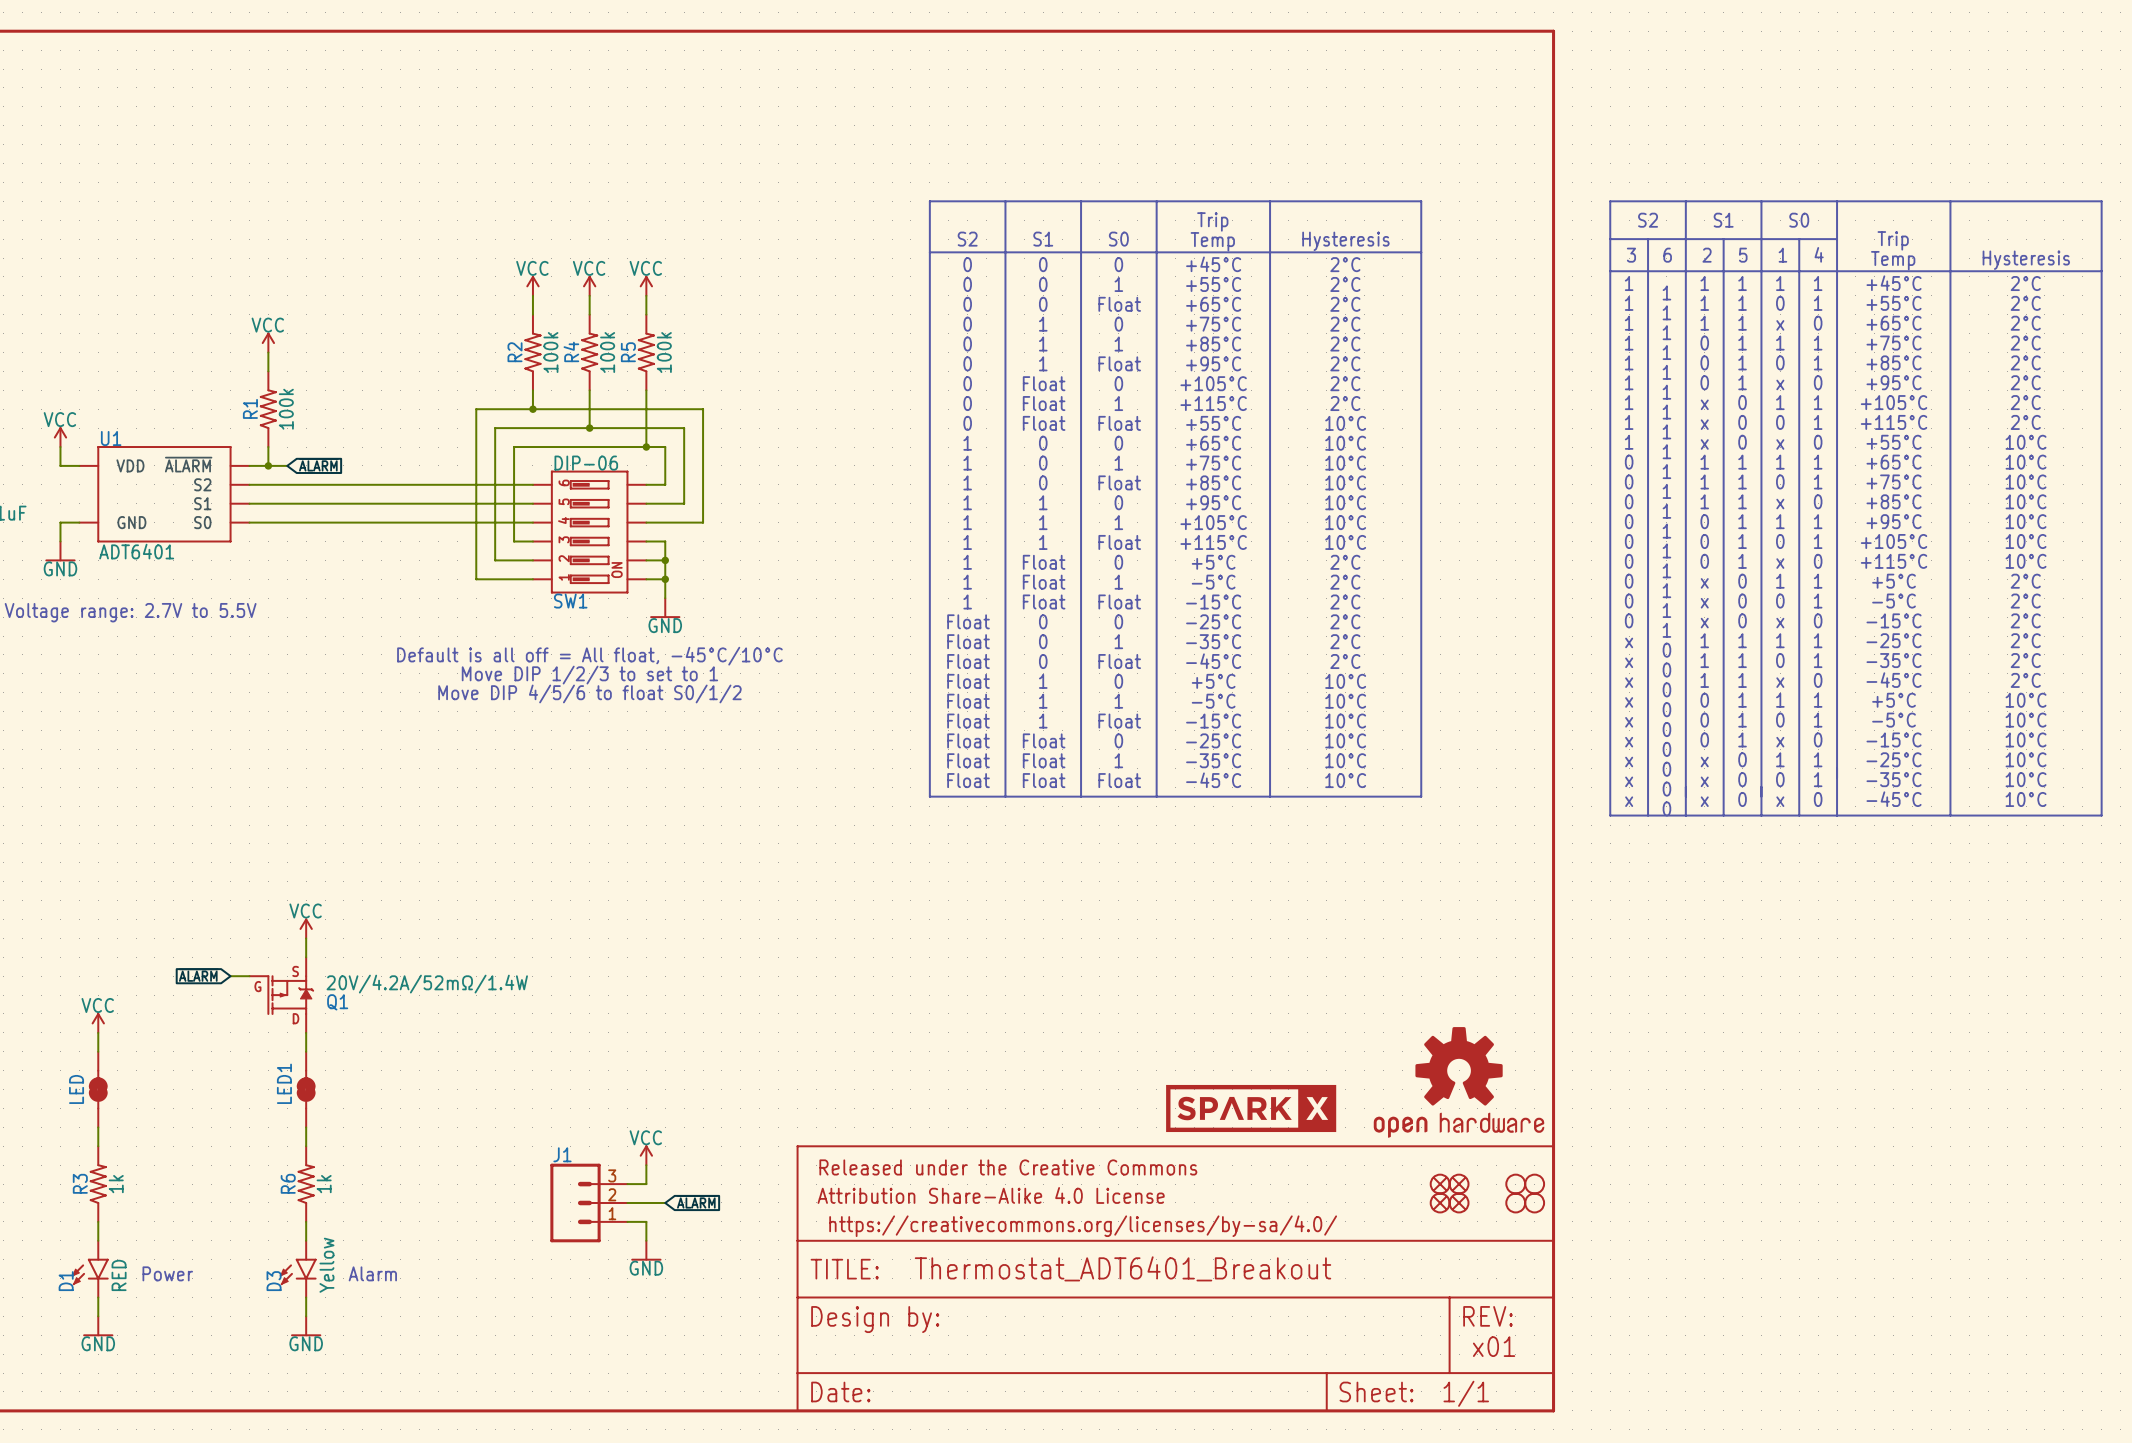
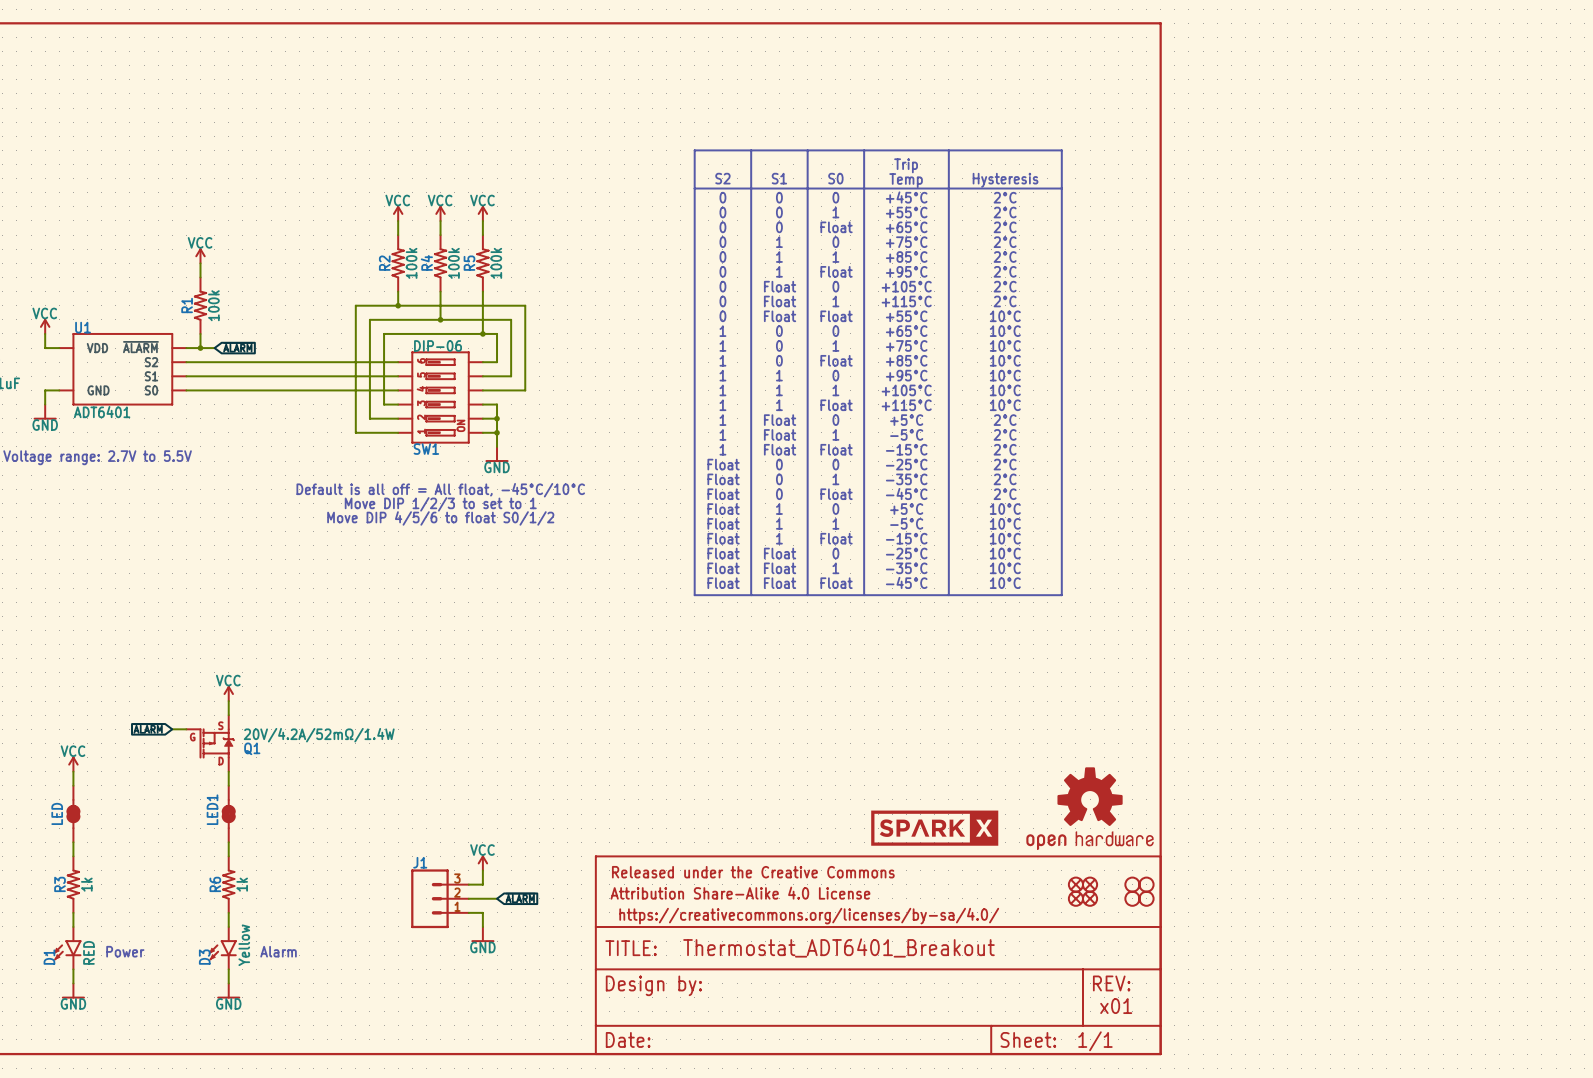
line: (1610, 201) (1610, 815) (2101, 815) (2101, 201) (1610, 201) -> none
line: (1685, 201) (1685, 796) -> none
line: (1761, 201) (1761, 796) -> none
line: (1837, 201) (1837, 777) -> none
line: (1950, 201) (1950, 815) -> none
text: S2 (1648, 220) -> none
text: S1 (1723, 220) -> none
text: S0 (1799, 220) -> none
line: (1610, 239) (1837, 239) -> none
line: (1648, 239) (1648, 815) -> none
line: (1723, 239) (1723, 815) -> none
line: (1799, 239) (1799, 815) -> none
text: Trip (1893, 240) -> none
text: 4 (1819, 254) -> none
text: 3 (1631, 255) -> none
text: 6 (1667, 255) -> none
text: 2 (1707, 255) -> none
text: 5 (1743, 255) -> none
text: 1 (1782, 255) -> none
text: Temp (1893, 260) -> none
text: Hysteresis (2026, 260) -> none
line: (1610, 271) (2101, 271) -> none
text: 1 (1629, 283) -> none
text: 1 (1704, 283) -> none
text: 1 (1742, 283) -> none
text: 1 (1780, 283) -> none
text: 1 (1818, 283) -> none
text: +45°C (1894, 283) -> none
text: 2°C (2025, 283) -> none
text: 1 (1666, 292) -> none
text: 1 (1629, 303) -> none
text: 1 (1704, 303) -> none
text: 1 (1742, 303) -> none
text: 0 (1780, 303) -> none
text: 1 (1818, 303) -> none
text: +55°C (1894, 303) -> none
text: 2°C (2025, 303) -> none
text: 1 (1666, 312) -> none
text: 1 (1629, 323) -> none
text: 1 (1704, 323) -> none
text: 1 (1742, 323) -> none
text: 0 (1818, 323) -> none
text: +65°C (1894, 323) -> none
text: 2°C (2025, 323) -> none
text: x (1780, 325) -> none
text: 1 (1666, 332) -> none
text: 1 (1629, 343) -> none
text: 0 (1704, 343) -> none
text: 1 (1742, 343) -> none
text: 1 (1780, 343) -> none
text: 1 (1818, 343) -> none
text: +75°C (1894, 343) -> none
text: 2°C (2025, 343) -> none
text: 1 (1666, 352) -> none
text: 1 (1629, 362) -> none
text: 0 (1704, 362) -> none
text: 1 (1742, 362) -> none
text: 0 (1780, 362) -> none
text: 1 (1818, 362) -> none
text: +85°C (1894, 362) -> none
text: 2°C (2025, 362) -> none
text: 1 (1666, 372) -> none
text: 1 (1629, 382) -> none
text: 0 (1704, 382) -> none
text: 1 (1742, 382) -> none
text: 0 (1818, 382) -> none
text: +95°C (1894, 382) -> none
text: 2°C (2025, 382) -> none
text: x (1780, 384) -> none
text: 1 (1666, 392) -> none
text: 1 (1629, 402) -> none
text: 0 (1742, 402) -> none
text: 1 (1780, 402) -> none
text: 1 (1818, 402) -> none
text: +105°C (1894, 402) -> none
text: 2°C (2025, 402) -> none
text: x (1704, 404) -> none
text: 1 (1666, 412) -> none
text: 1 (1629, 422) -> none
text: 0 (1742, 422) -> none
text: 0 (1780, 422) -> none
text: 1 (1818, 422) -> none
text: +115°C (1894, 422) -> none
text: 2°C (2025, 422) -> none
text: x (1704, 424) -> none
text: 1 (1666, 431) -> none
text: 1 (1629, 442) -> none
text: 0 (1742, 442) -> none
text: 0 (1818, 442) -> none
text: +55°C (1894, 442) -> none
text: 10°C (2026, 442) -> none
text: x (1704, 444) -> none
text: x (1780, 444) -> none
text: 1 (1666, 451) -> none
text: 0 (1629, 462) -> none
text: 1 (1704, 462) -> none
text: 1 (1742, 462) -> none
text: 1 (1780, 462) -> none
text: 1 (1818, 462) -> none
text: +65°C (1894, 462) -> none
text: 10°C (2026, 462) -> none
text: 1 (1666, 471) -> none
text: 0 (1629, 481) -> none
text: 1 (1704, 481) -> none
text: 1 (1742, 481) -> none
text: 0 (1780, 481) -> none
text: 1 (1818, 481) -> none
text: +75°C (1894, 481) -> none
text: 10°C (2026, 481) -> none
text: 1 (1666, 491) -> none
text: 0 (1629, 501) -> none
text: 1 (1704, 501) -> none
text: 1 (1742, 501) -> none
text: 0 (1818, 501) -> none
text: +85°C (1894, 501) -> none
text: 10°C (2026, 501) -> none
text: x (1780, 504) -> none
text: 1 (1666, 511) -> none
text: 0 (1629, 521) -> none
text: 0 (1704, 521) -> none
text: 1 (1742, 521) -> none
text: 1 (1780, 521) -> none
text: 1 (1818, 521) -> none
text: +95°C (1894, 521) -> none
text: 10°C (2026, 521) -> none
text: 1 (1666, 531) -> none
text: 0 (1629, 541) -> none
text: 0 (1704, 541) -> none
text: 1 (1742, 541) -> none
text: 0 (1780, 541) -> none
text: 1 (1818, 541) -> none
text: +105°C (1894, 541) -> none
text: 10°C (2026, 541) -> none
text: 1 (1666, 550) -> none
text: 0 (1629, 561) -> none
text: 0 (1704, 561) -> none
text: 1 (1742, 561) -> none
text: 0 (1818, 561) -> none
text: +115°C (1894, 561) -> none
text: 10°C (2026, 561) -> none
text: x (1780, 563) -> none
text: 1 (1666, 570) -> none
text: 0 (1629, 581) -> none
text: 0 (1742, 581) -> none
text: 1 (1780, 581) -> none
text: 1 (1818, 581) -> none
text: +5°C (1894, 581) -> none
text: 2°C (2025, 581) -> none
text: x (1704, 583) -> none
text: 1 (1666, 590) -> none
text: 0 (1629, 601) -> none
text: 0 (1742, 601) -> none
text: 0 (1780, 601) -> none
text: 1 (1818, 601) -> none
text: -5°C (1894, 601) -> none
text: 2°C (2025, 601) -> none
text: x (1704, 603) -> none
text: 1 (1666, 610) -> none
text: 0 (1629, 620) -> none
text: 0 (1742, 620) -> none
text: 0 (1818, 620) -> none
text: -15°C (1894, 620) -> none
text: 2°C (2025, 620) -> none
text: x (1704, 623) -> none
text: x (1780, 623) -> none
text: 1 (1666, 630) -> none
text: 1 (1704, 640) -> none
text: 1 (1742, 640) -> none
text: 1 (1780, 640) -> none
text: 1 (1818, 640) -> none
text: -25°C (1894, 640) -> none
text: 2°C (2025, 640) -> none
text: x (1629, 642) -> none
text: 0 (1666, 650) -> none
text: 1 (1704, 660) -> none
text: 1 (1742, 660) -> none
text: 0 (1780, 660) -> none
text: 1 (1818, 660) -> none
text: -35°C (1894, 660) -> none
text: 2°C (2025, 660) -> none
text: x (1629, 662) -> none
text: 0 (1666, 670) -> none
text: 1 (1704, 680) -> none
text: 1 (1742, 680) -> none
text: 0 (1818, 680) -> none
text: -45°C (1894, 680) -> none
text: 2°C (2025, 680) -> none
text: x (1629, 682) -> none
text: x (1780, 682) -> none
text: 0 (1666, 689) -> none
text: 0 (1704, 700) -> none
text: 1 (1742, 700) -> none
text: 1 (1780, 700) -> none
text: 1 (1818, 700) -> none
text: +5°C (1894, 700) -> none
text: 10°C (2026, 700) -> none
text: x (1629, 702) -> none
text: 0 (1666, 709) -> none
text: 0 (1704, 720) -> none
text: 1 (1742, 720) -> none
text: 0 (1780, 720) -> none
text: 1 (1818, 720) -> none
text: -5°C (1894, 720) -> none
text: 10°C (2026, 720) -> none
text: x (1629, 722) -> none
text: 0 (1666, 729) -> none
text: 0 (1704, 739) -> none
text: 1 (1742, 739) -> none
text: 0 (1818, 739) -> none
text: -15°C (1894, 739) -> none
text: 10°C (2026, 739) -> none
text: x (1629, 742) -> none
text: x (1780, 742) -> none
text: 0 (1666, 749) -> none
text: 0 (1742, 759) -> none
text: 1 (1780, 759) -> none
text: 1 (1818, 759) -> none
text: -25°C (1894, 759) -> none
text: 10°C (2026, 759) -> none
text: x (1629, 762) -> none
text: x (1704, 762) -> none
line: (1837, 768) (1837, 815) -> none
text: 0 (1666, 769) -> none
text: 0 (1742, 779) -> none
text: 0 (1780, 779) -> none
text: 1 (1818, 779) -> none
text: -35°C (1894, 779) -> none
text: 10°C (2026, 779) -> none
text: x (1629, 781) -> none
text: x (1704, 781) -> none
line: (1685, 787) (1685, 815) -> none
line: (1761, 787) (1761, 815) -> none
text: 0 (1666, 789) -> none
text: 0 (1742, 799) -> none
text: 0 (1818, 799) -> none
text: -45°C (1894, 799) -> none
text: 10°C (2026, 799) -> none
text: x (1629, 801) -> none
text: x (1704, 801) -> none
text: x (1780, 801) -> none
text: 0 (1666, 808) -> none

